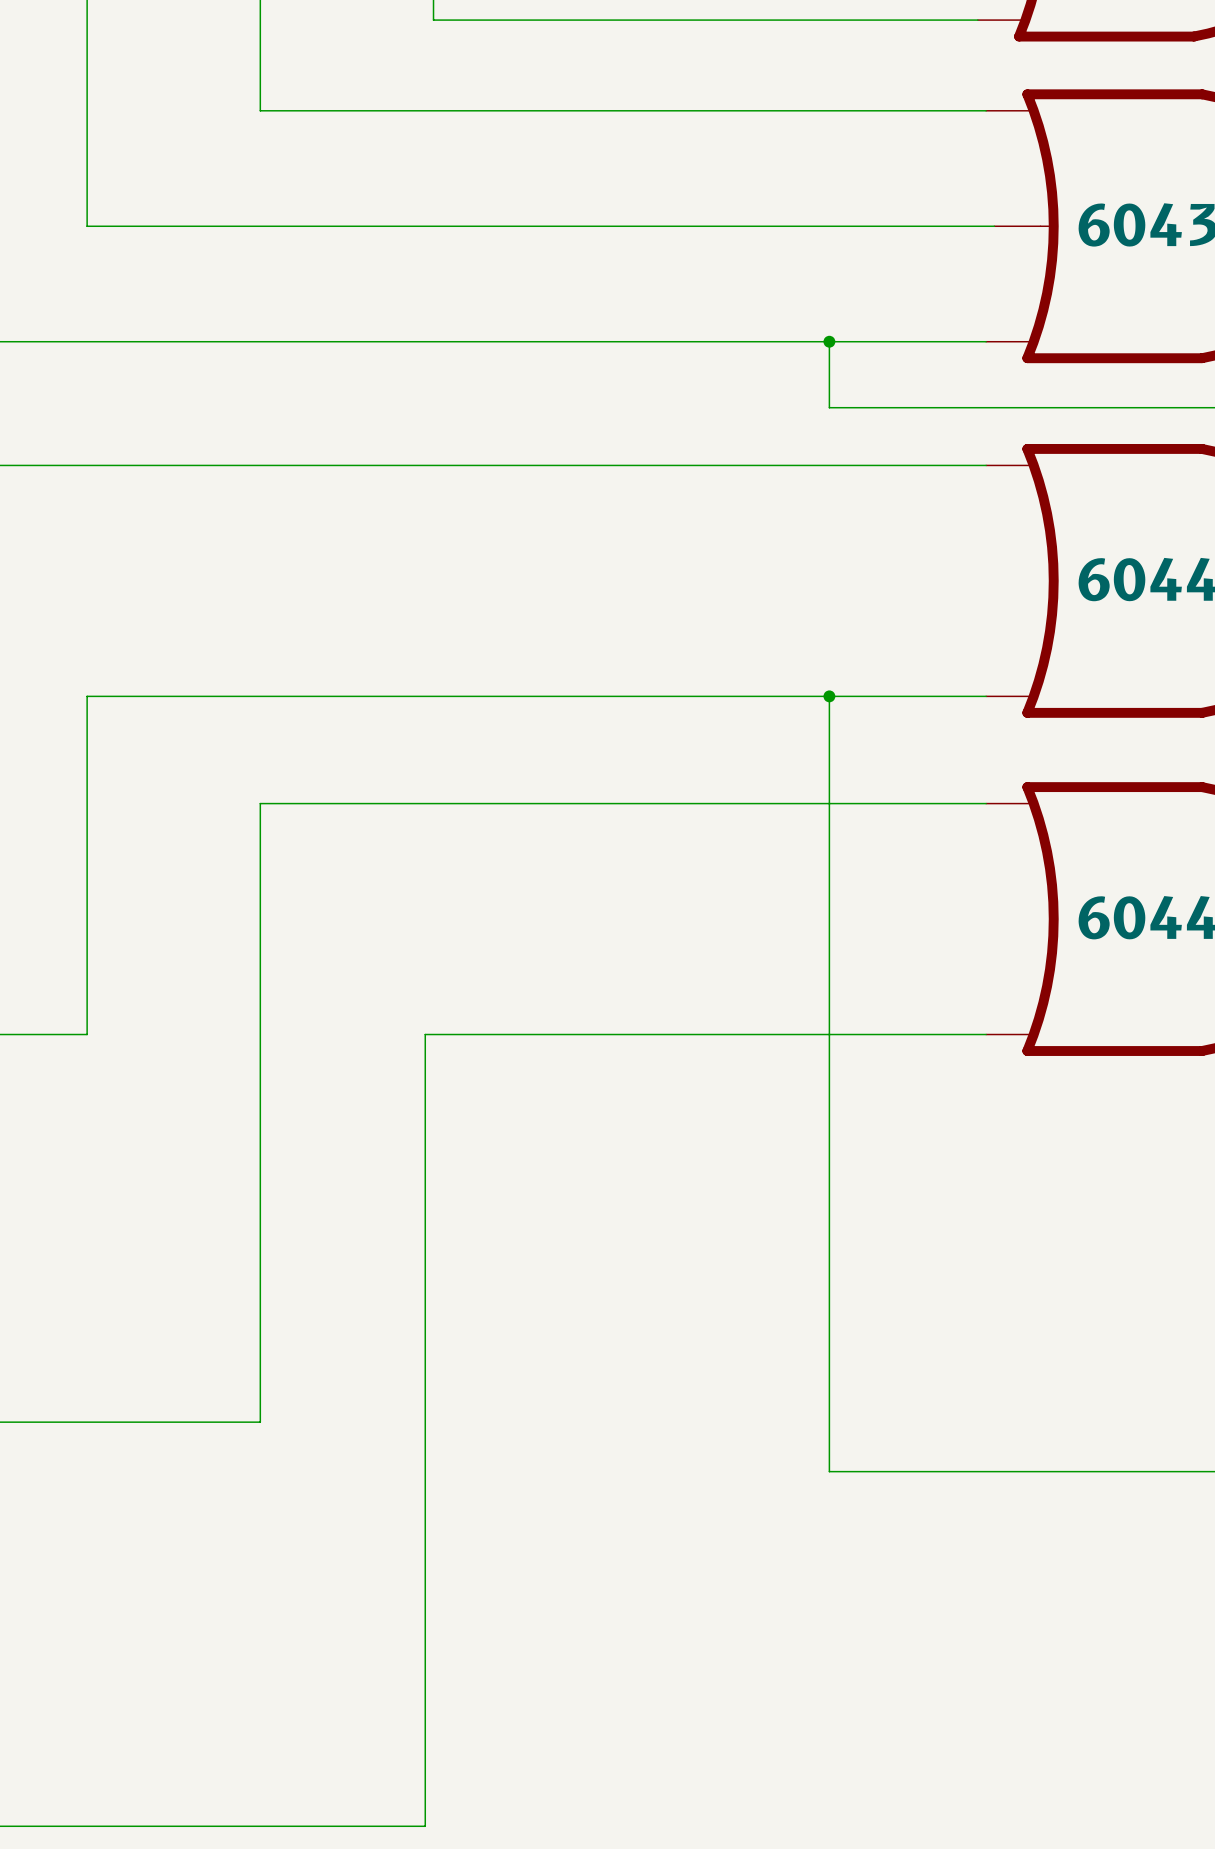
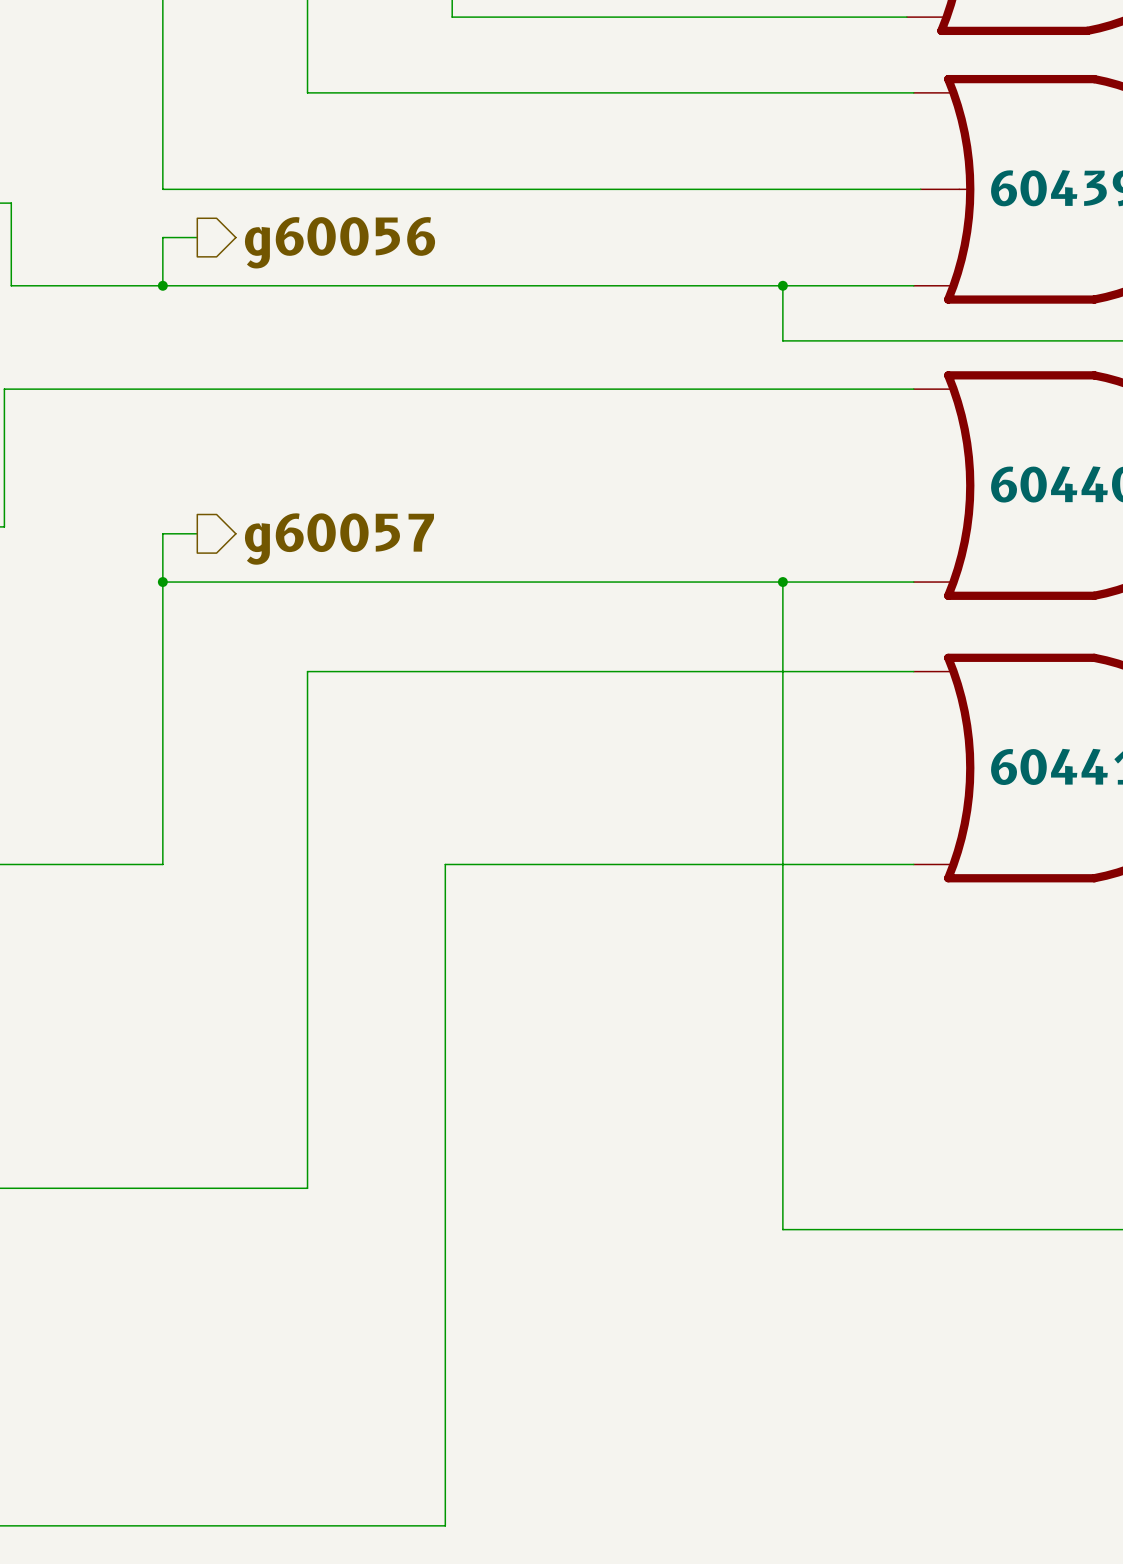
wire: none -> (197, 237) (162, 237) (162, 285)
hierarchical label: none -> g60056 (340, 242)
junction: none -> (162, 285)
wire: none -> (197, 533) (162, 533) (162, 582)
hierarchical label: none -> g60057 (339, 539)
junction: none -> (162, 582)

